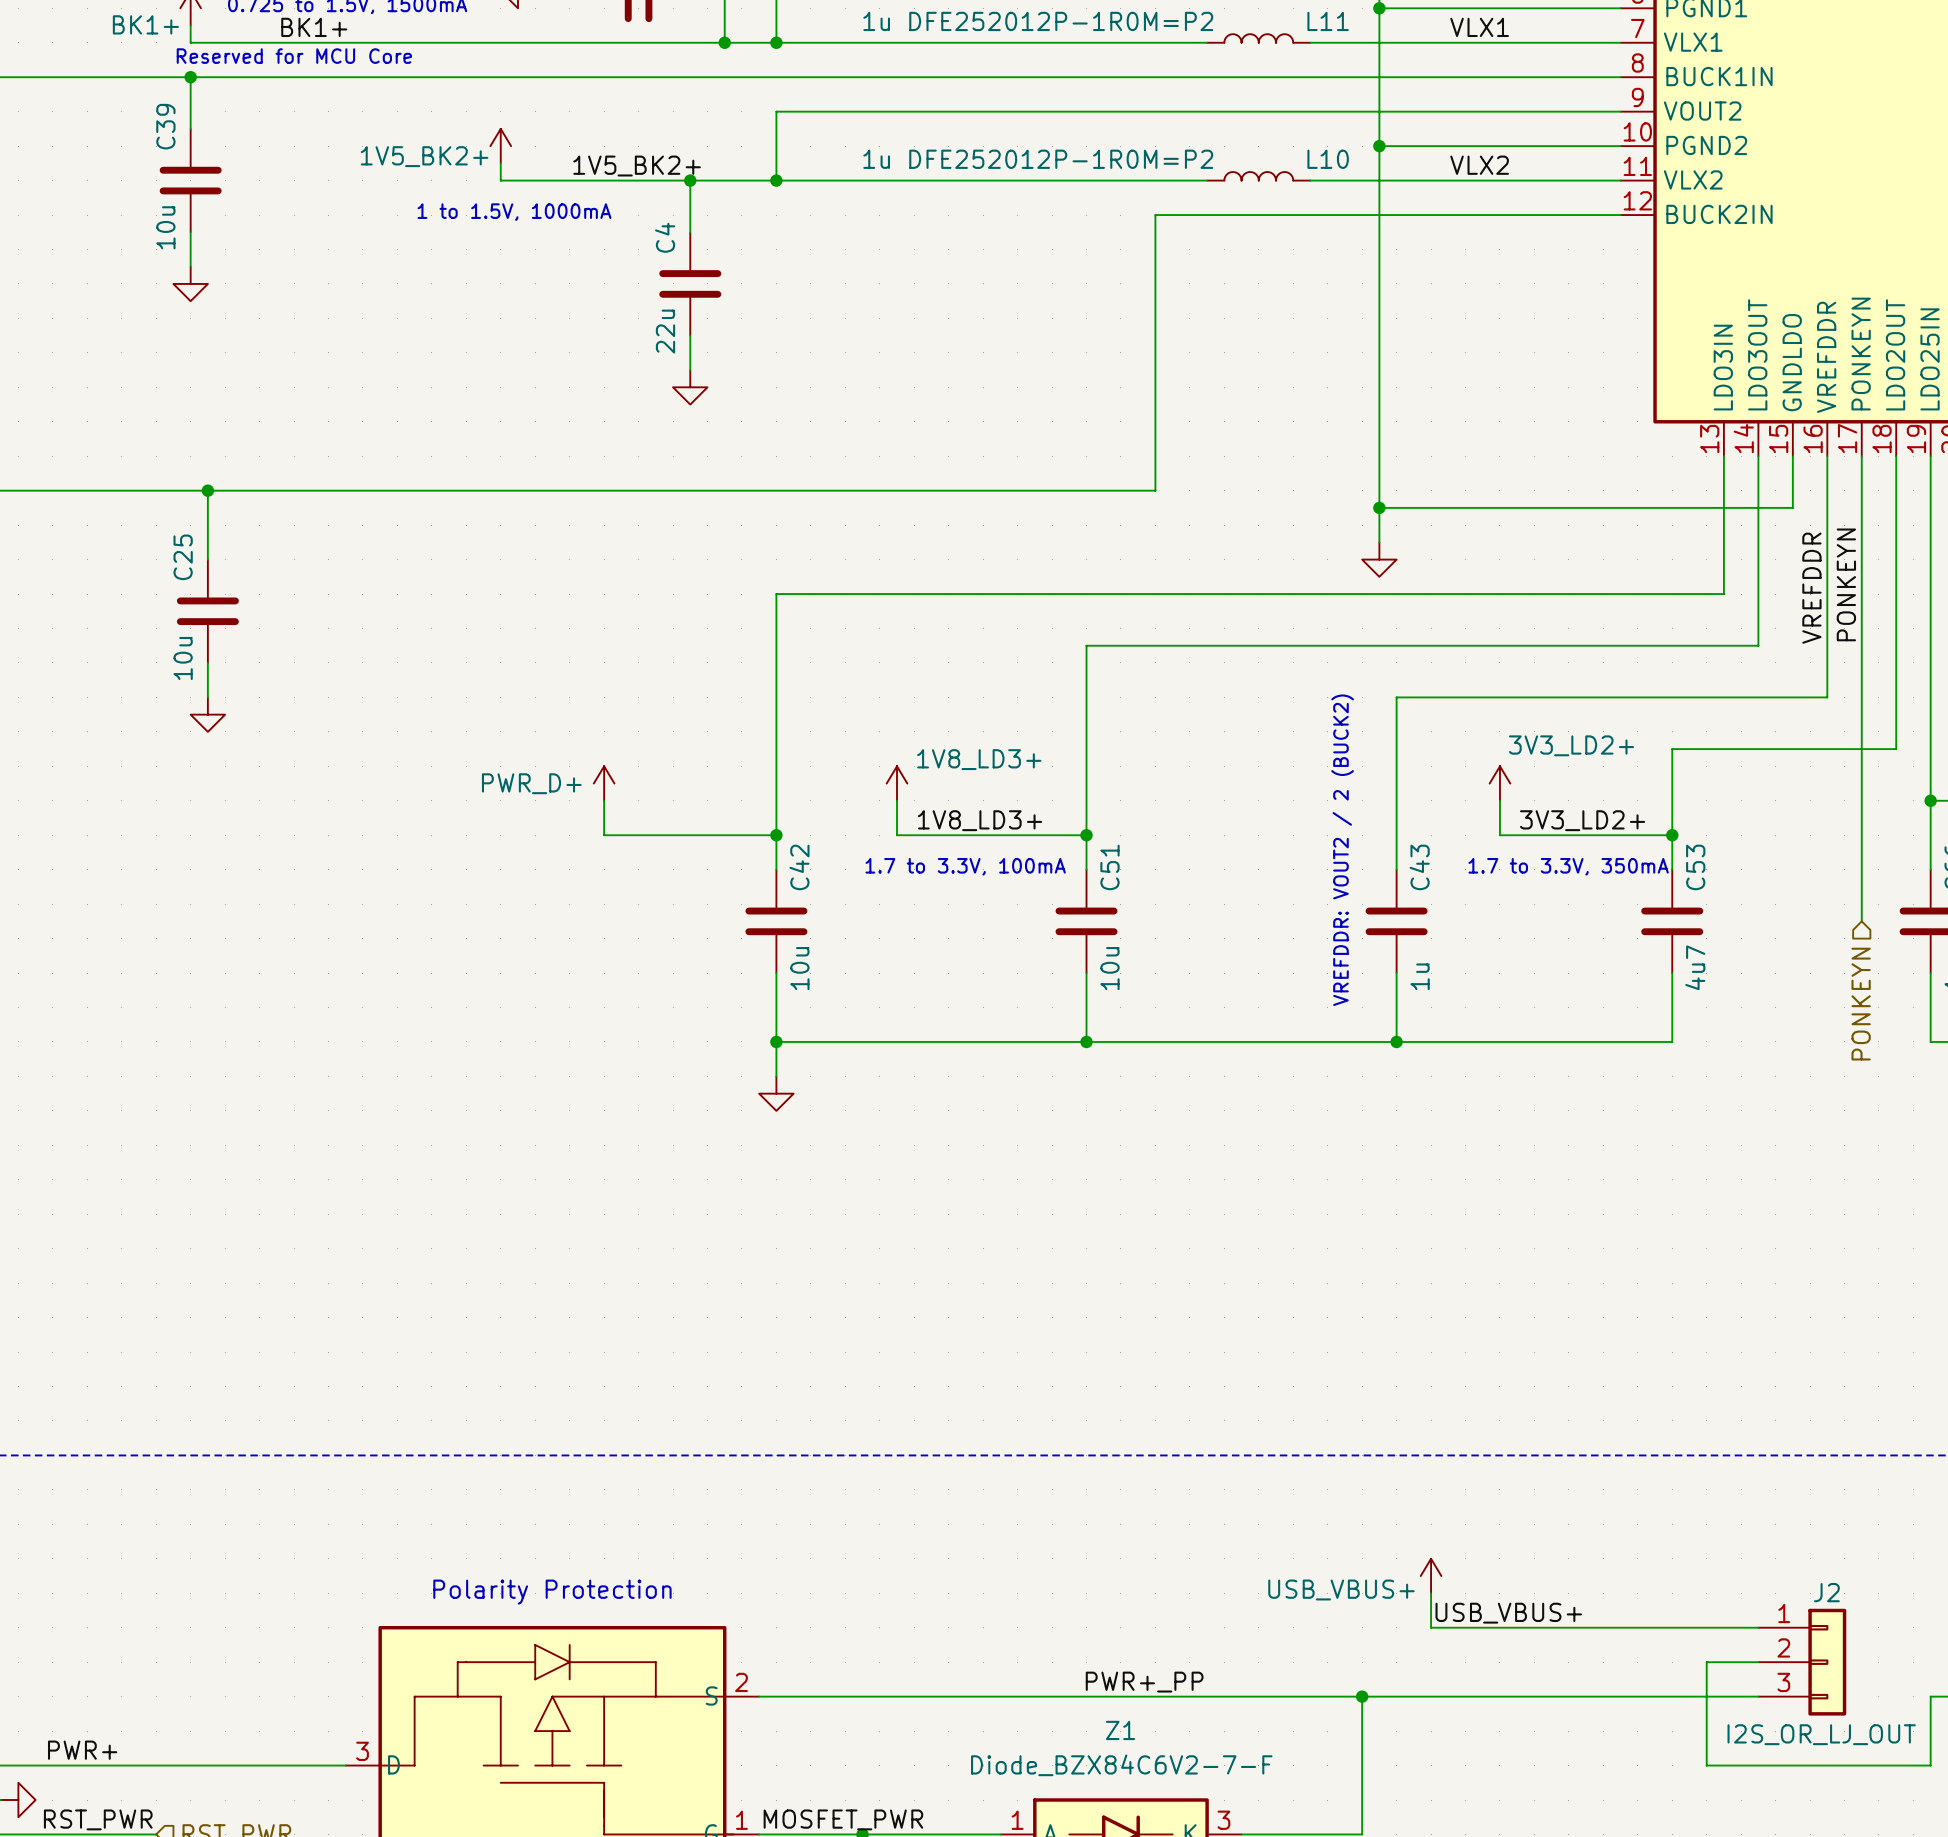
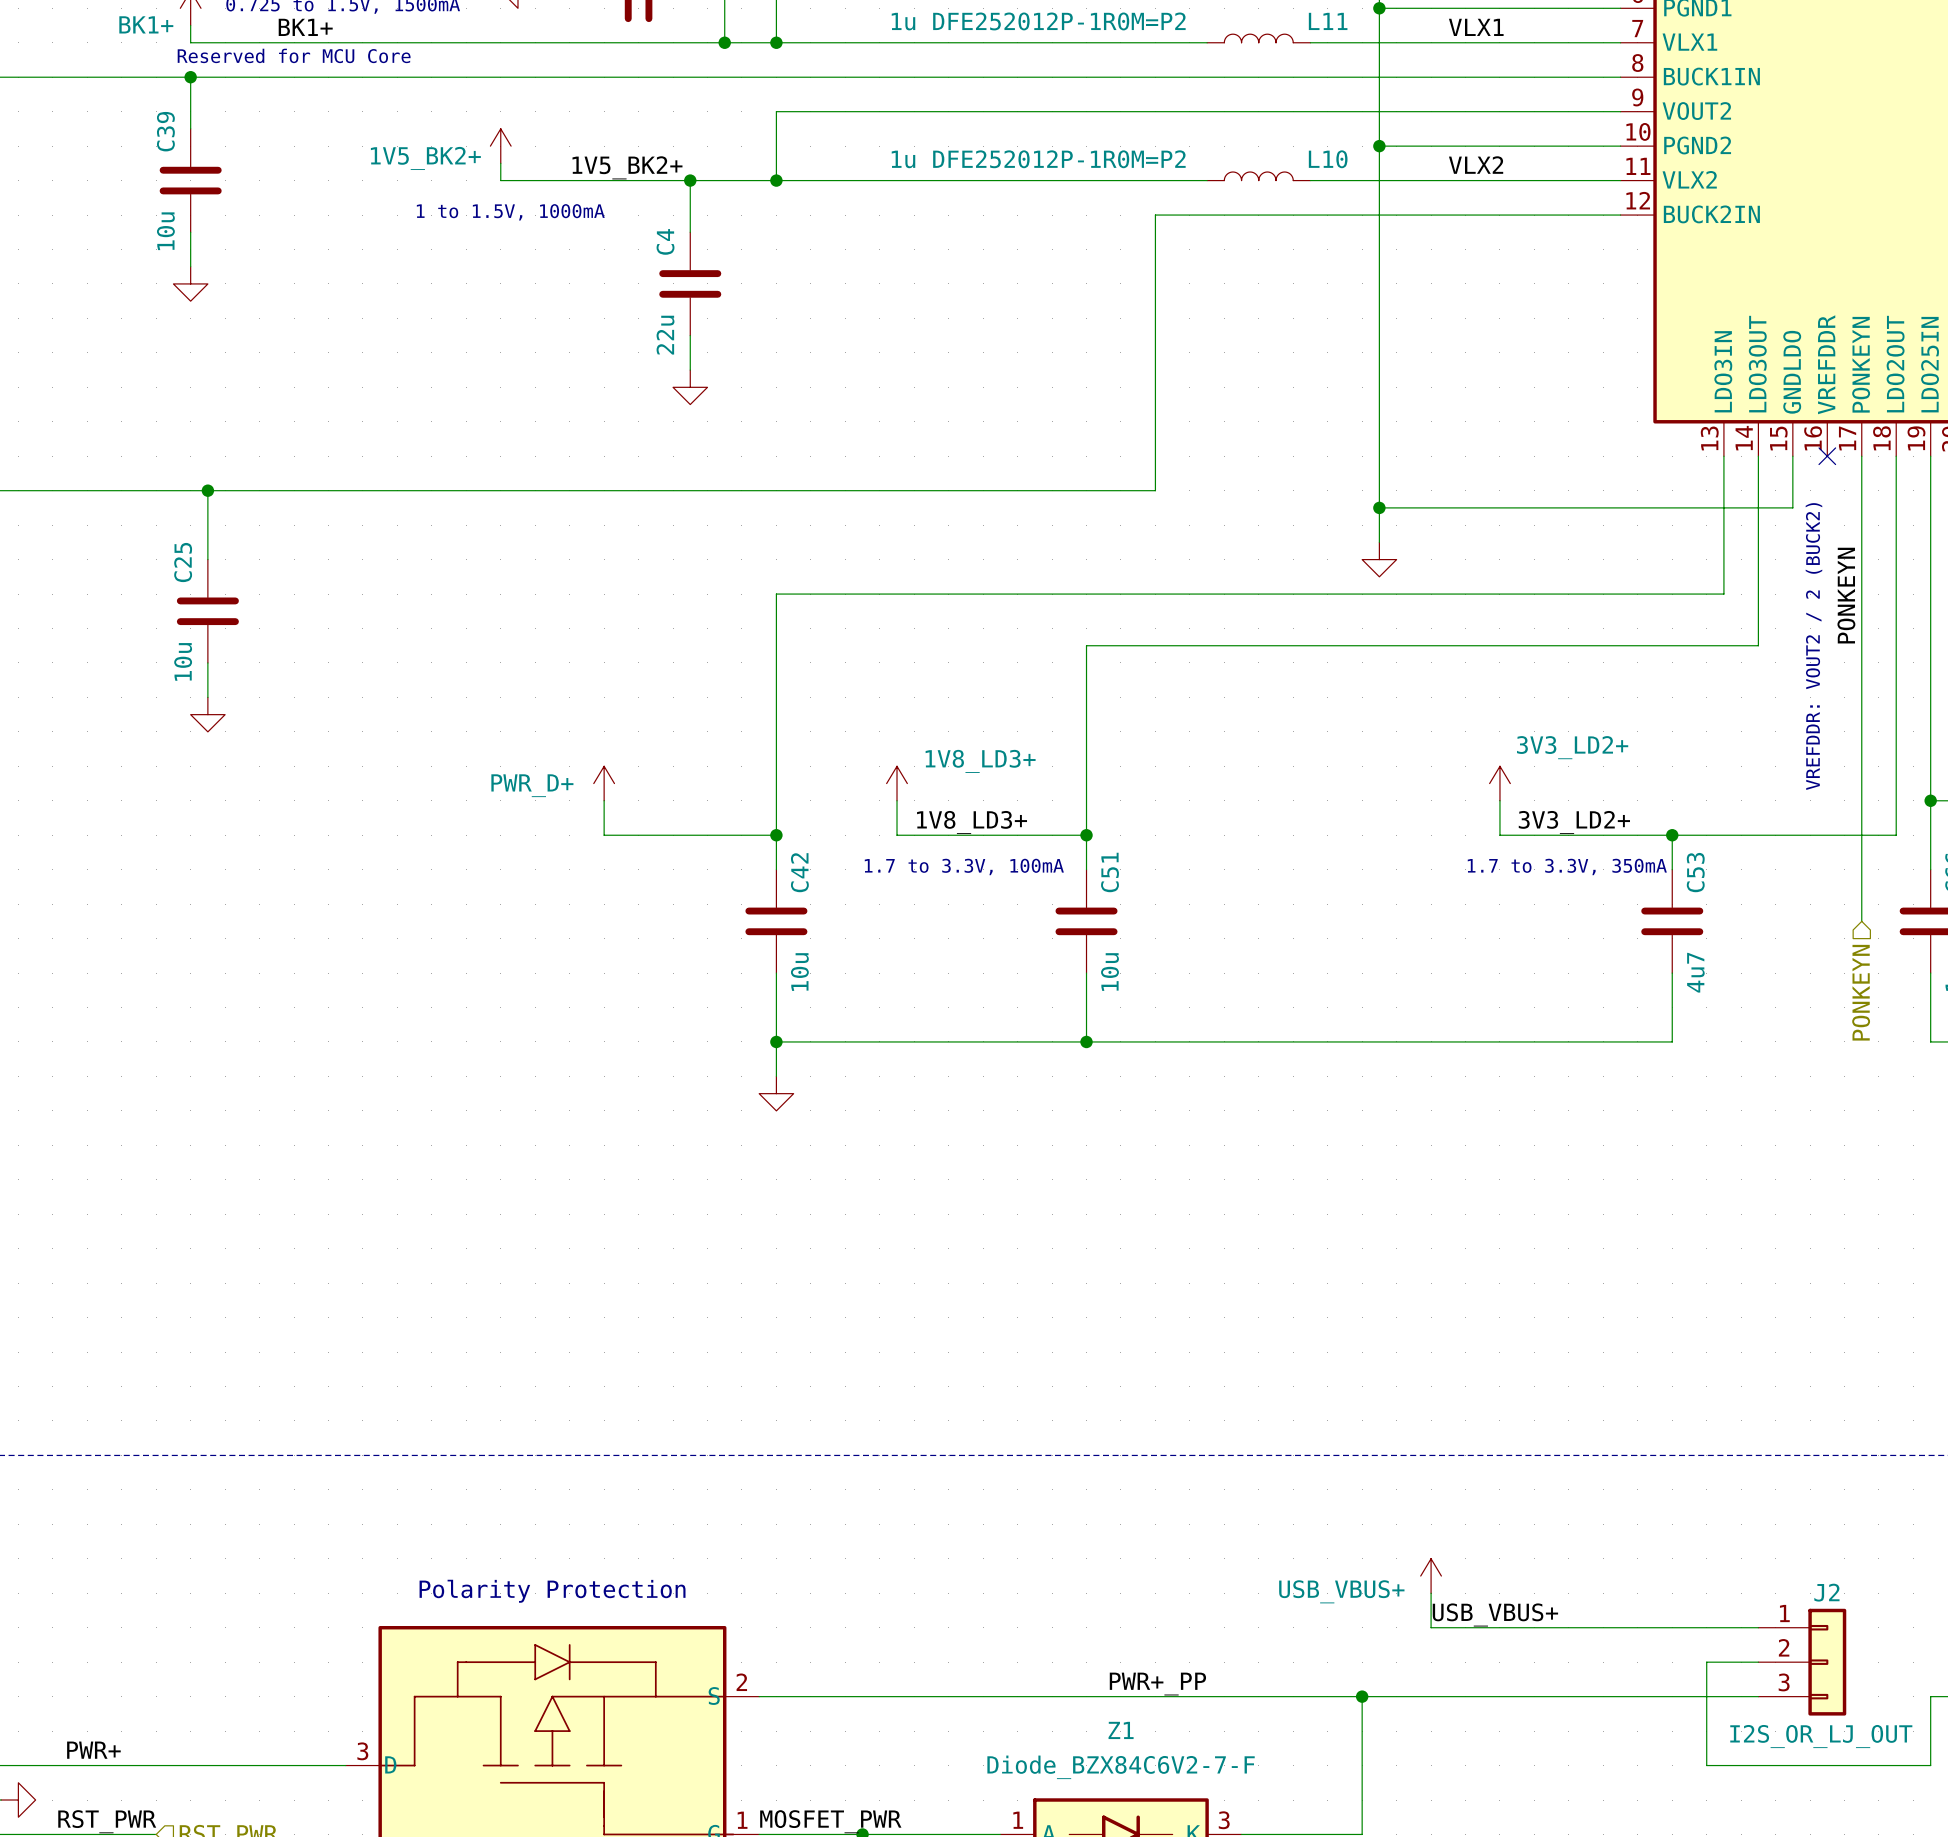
wire: (1827, 456) (1827, 697) (1396, 697) (1396, 869) -> none
no-connect mark: none -> (1827, 456)
label: VREFDDR (1811, 588) -> none
text: none -> VREFDDR: VOUT2 / 2 (BUCK2) (1813, 646)
wire: (1896, 749) (1672, 749) (1672, 835) -> (1896, 749) (1896, 835) (1672, 835)
text: VREFDDR: VOUT2 / 2 (BUCK2) (1342, 850) -> none
C43: 1u (1396, 921) -> none
wire: (1396, 973) (1396, 1041) -> none
junction: (1396, 1041) -> none

